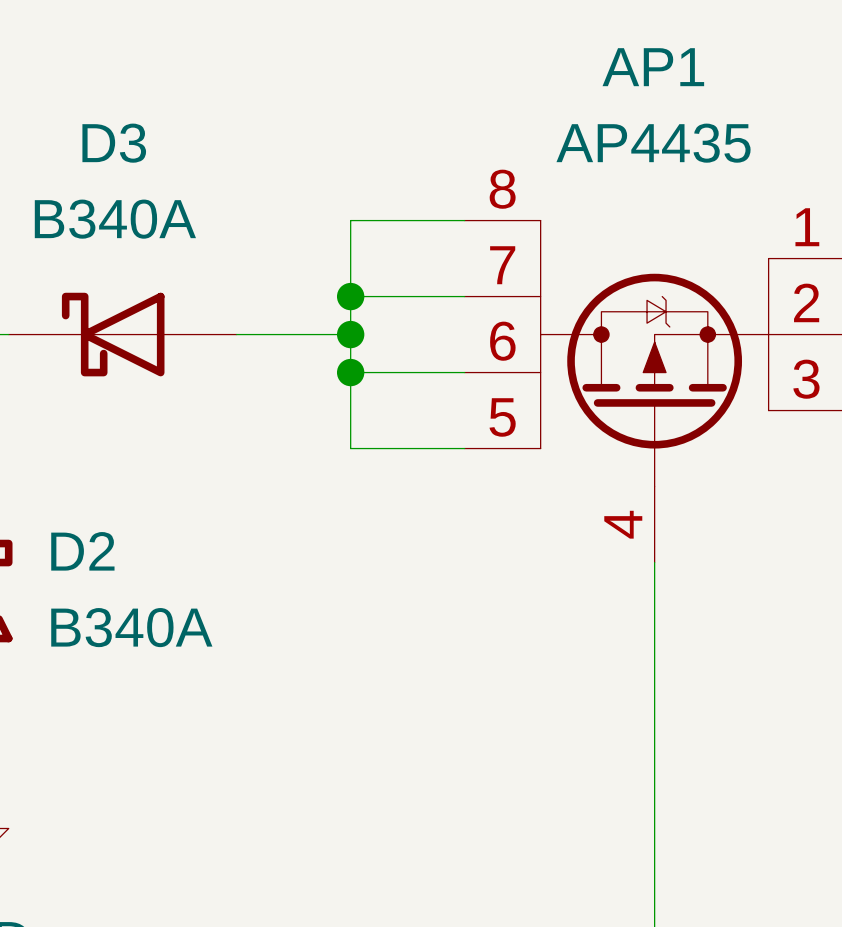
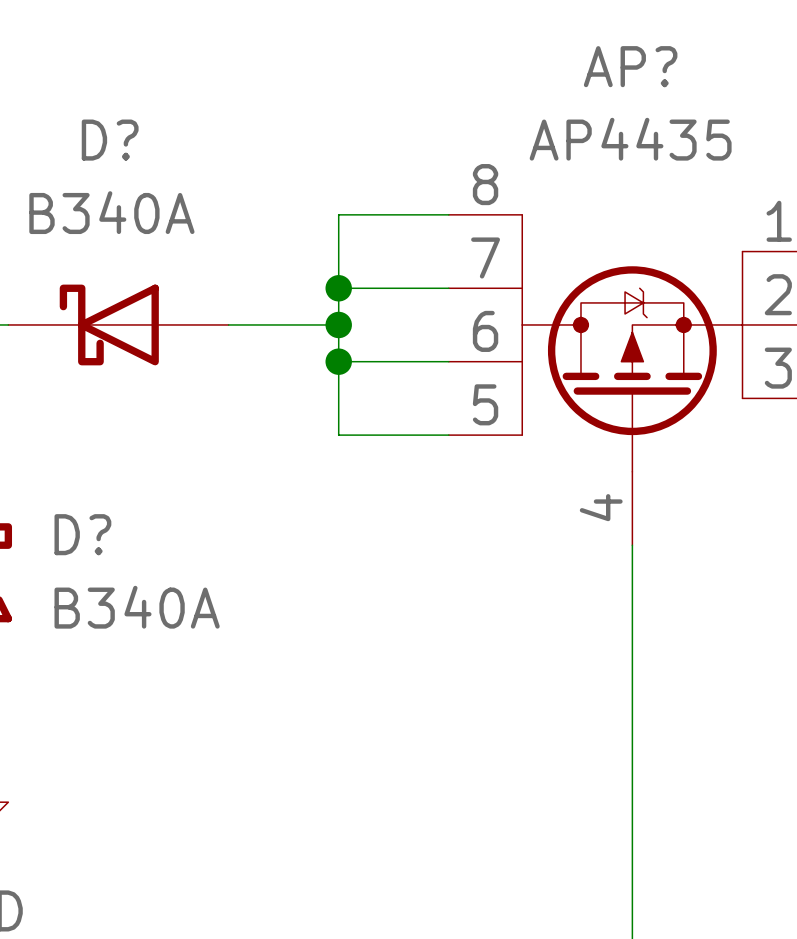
AP1 name: AP1 (653, 67) -> AP? (630, 66)
D3 name: D3 (114, 143) -> D? (110, 140)
D2 name: D2 (82, 551) -> D? (82, 534)

